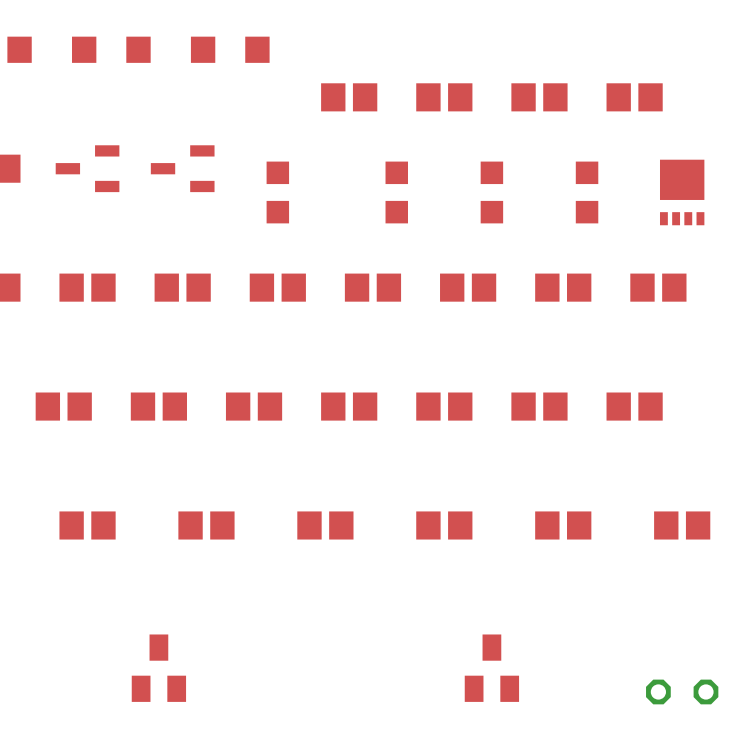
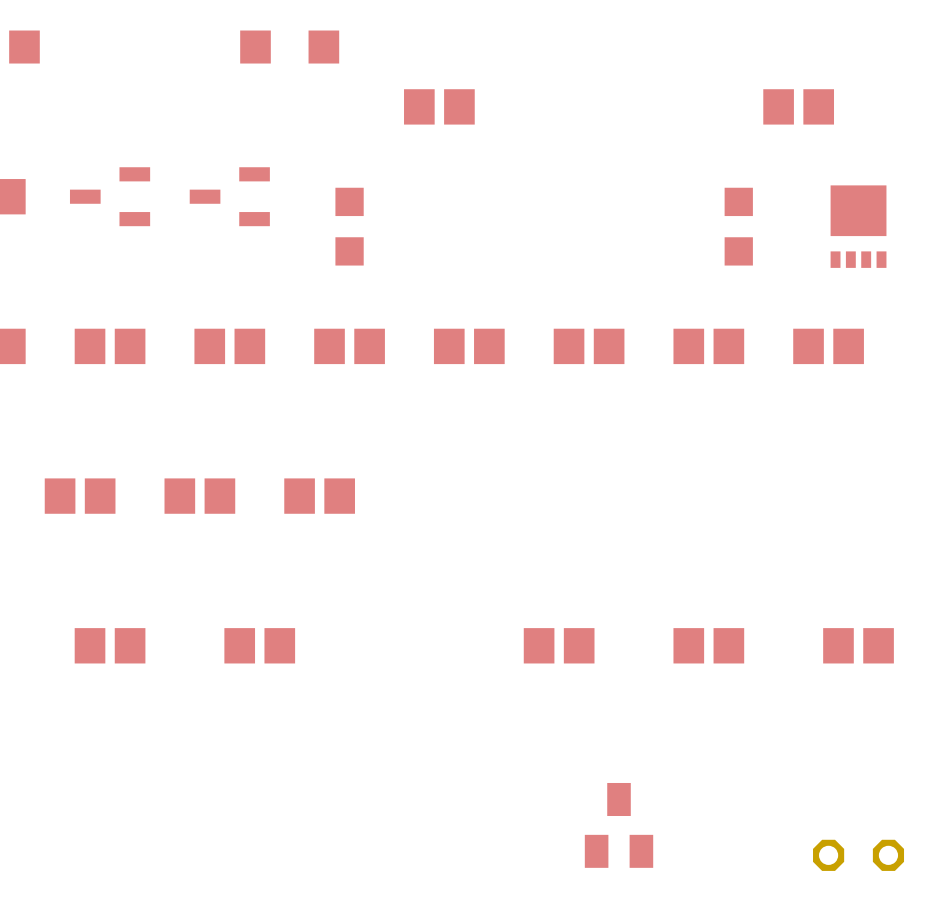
part: (111, 49) -> none
part: (444, 97) -> none
part: (539, 97) -> none
part: (396, 192) -> none
part: (491, 192) -> none
part: (349, 406) -> none
part: (444, 406) -> none
part: (539, 406) -> none
part: (634, 406) -> none
part: (325, 525) -> none
part: (158, 668) -> none

